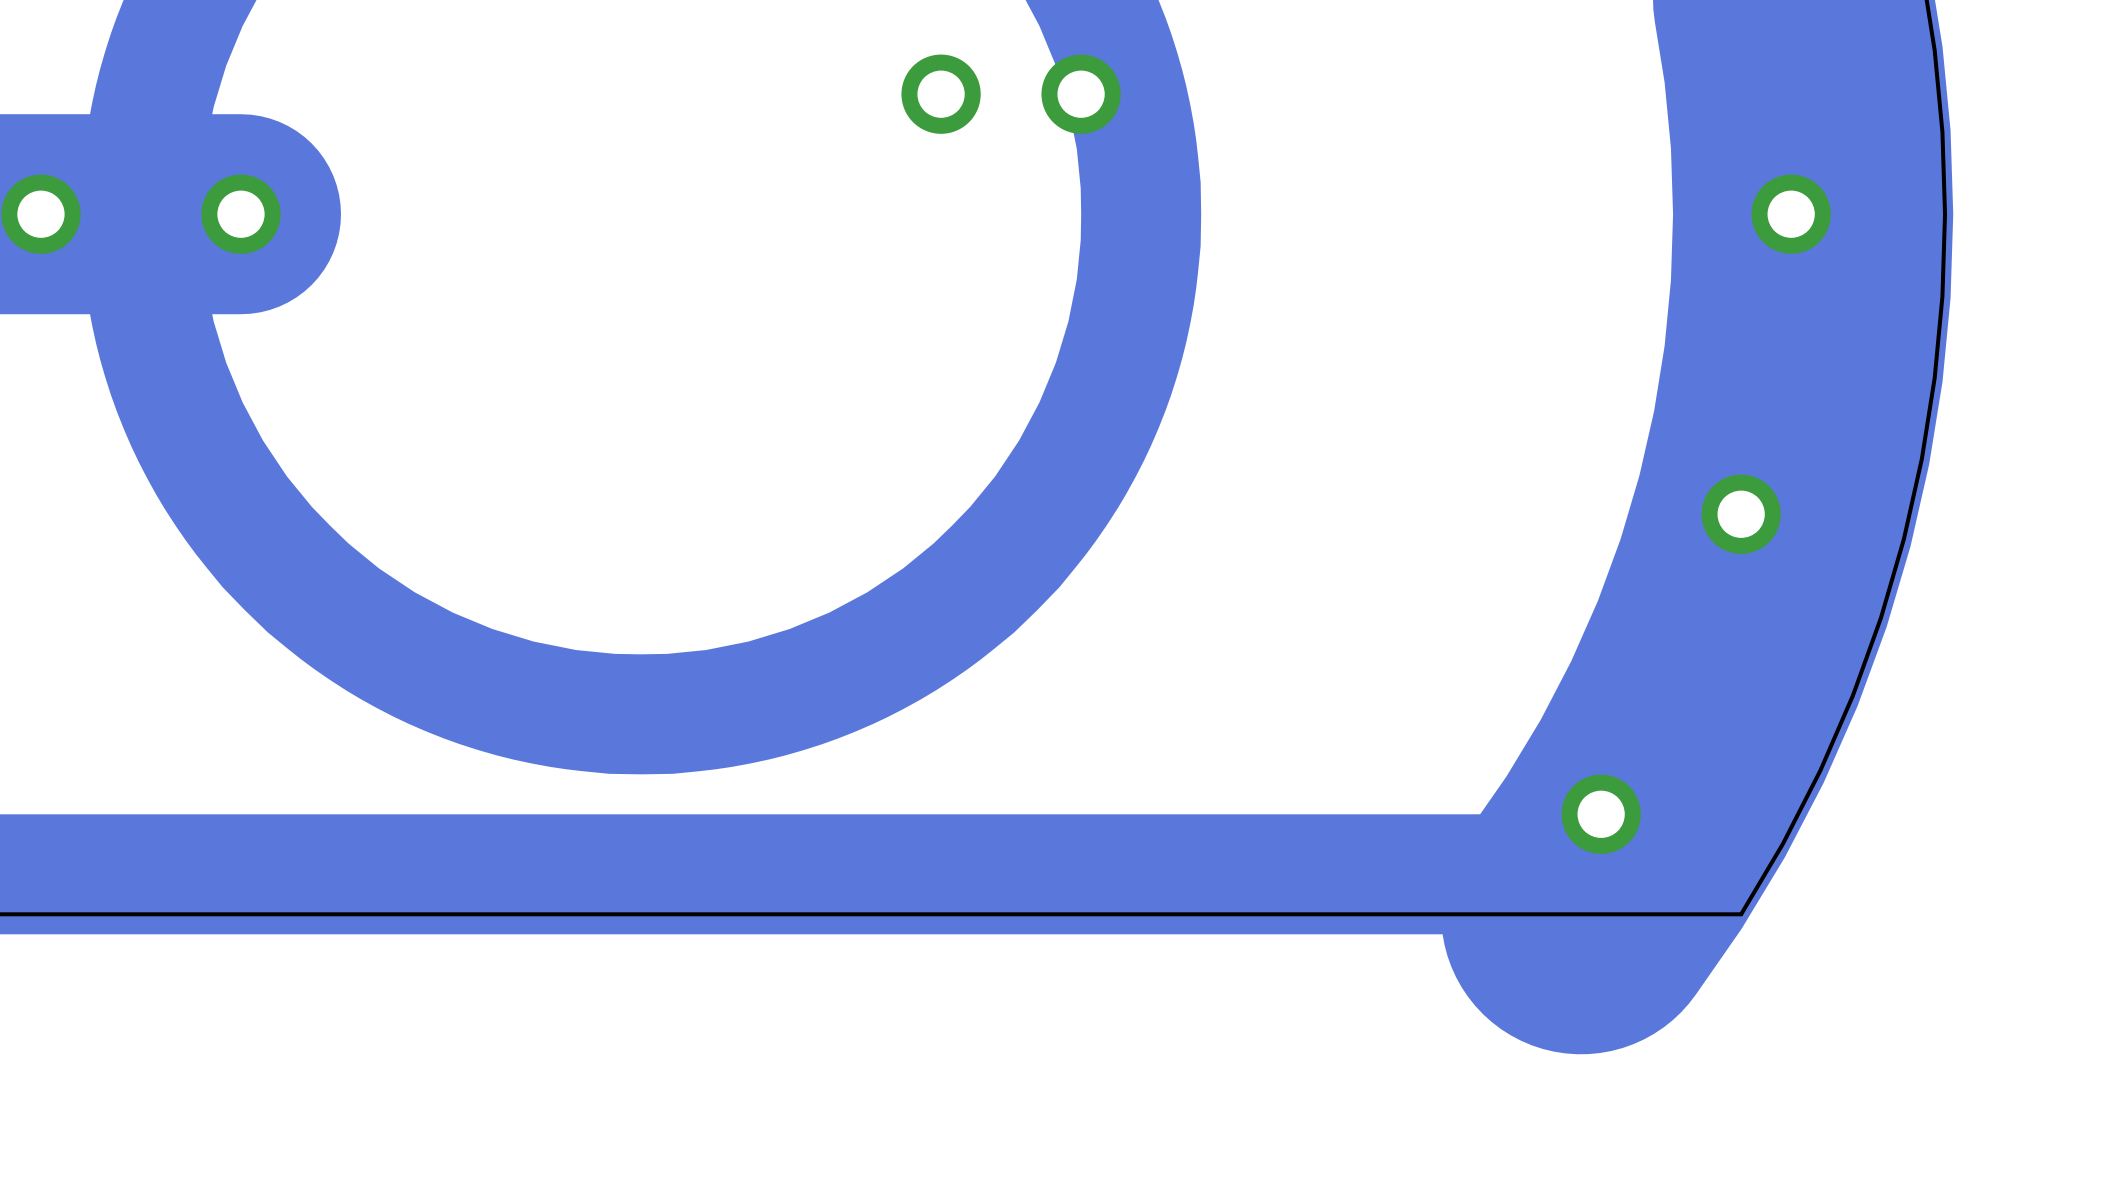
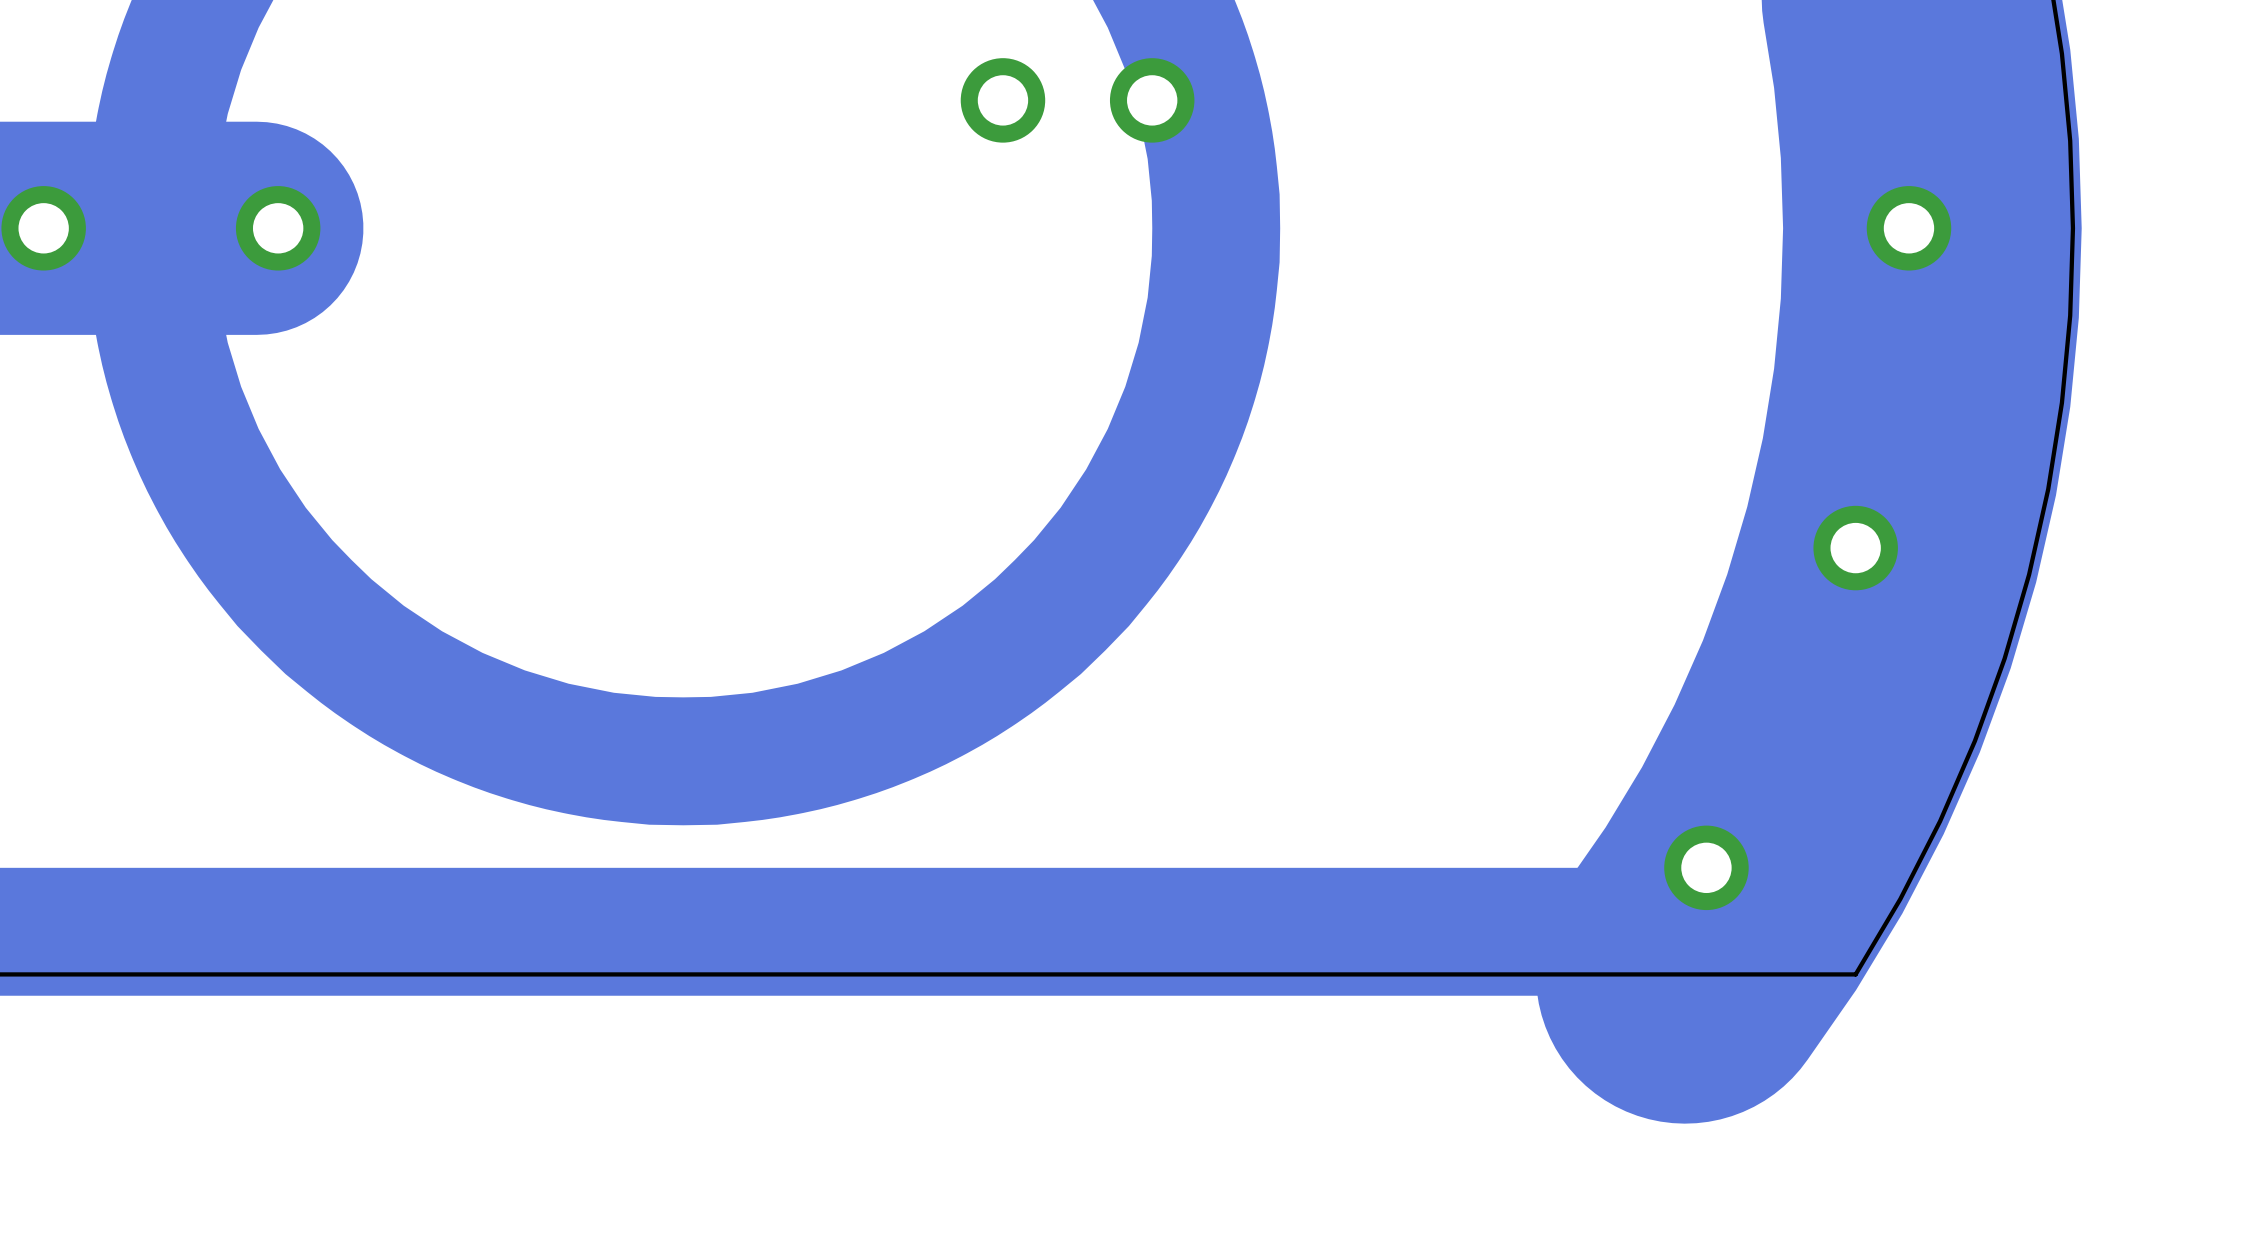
via position: (240, 214) -> (278, 228)

